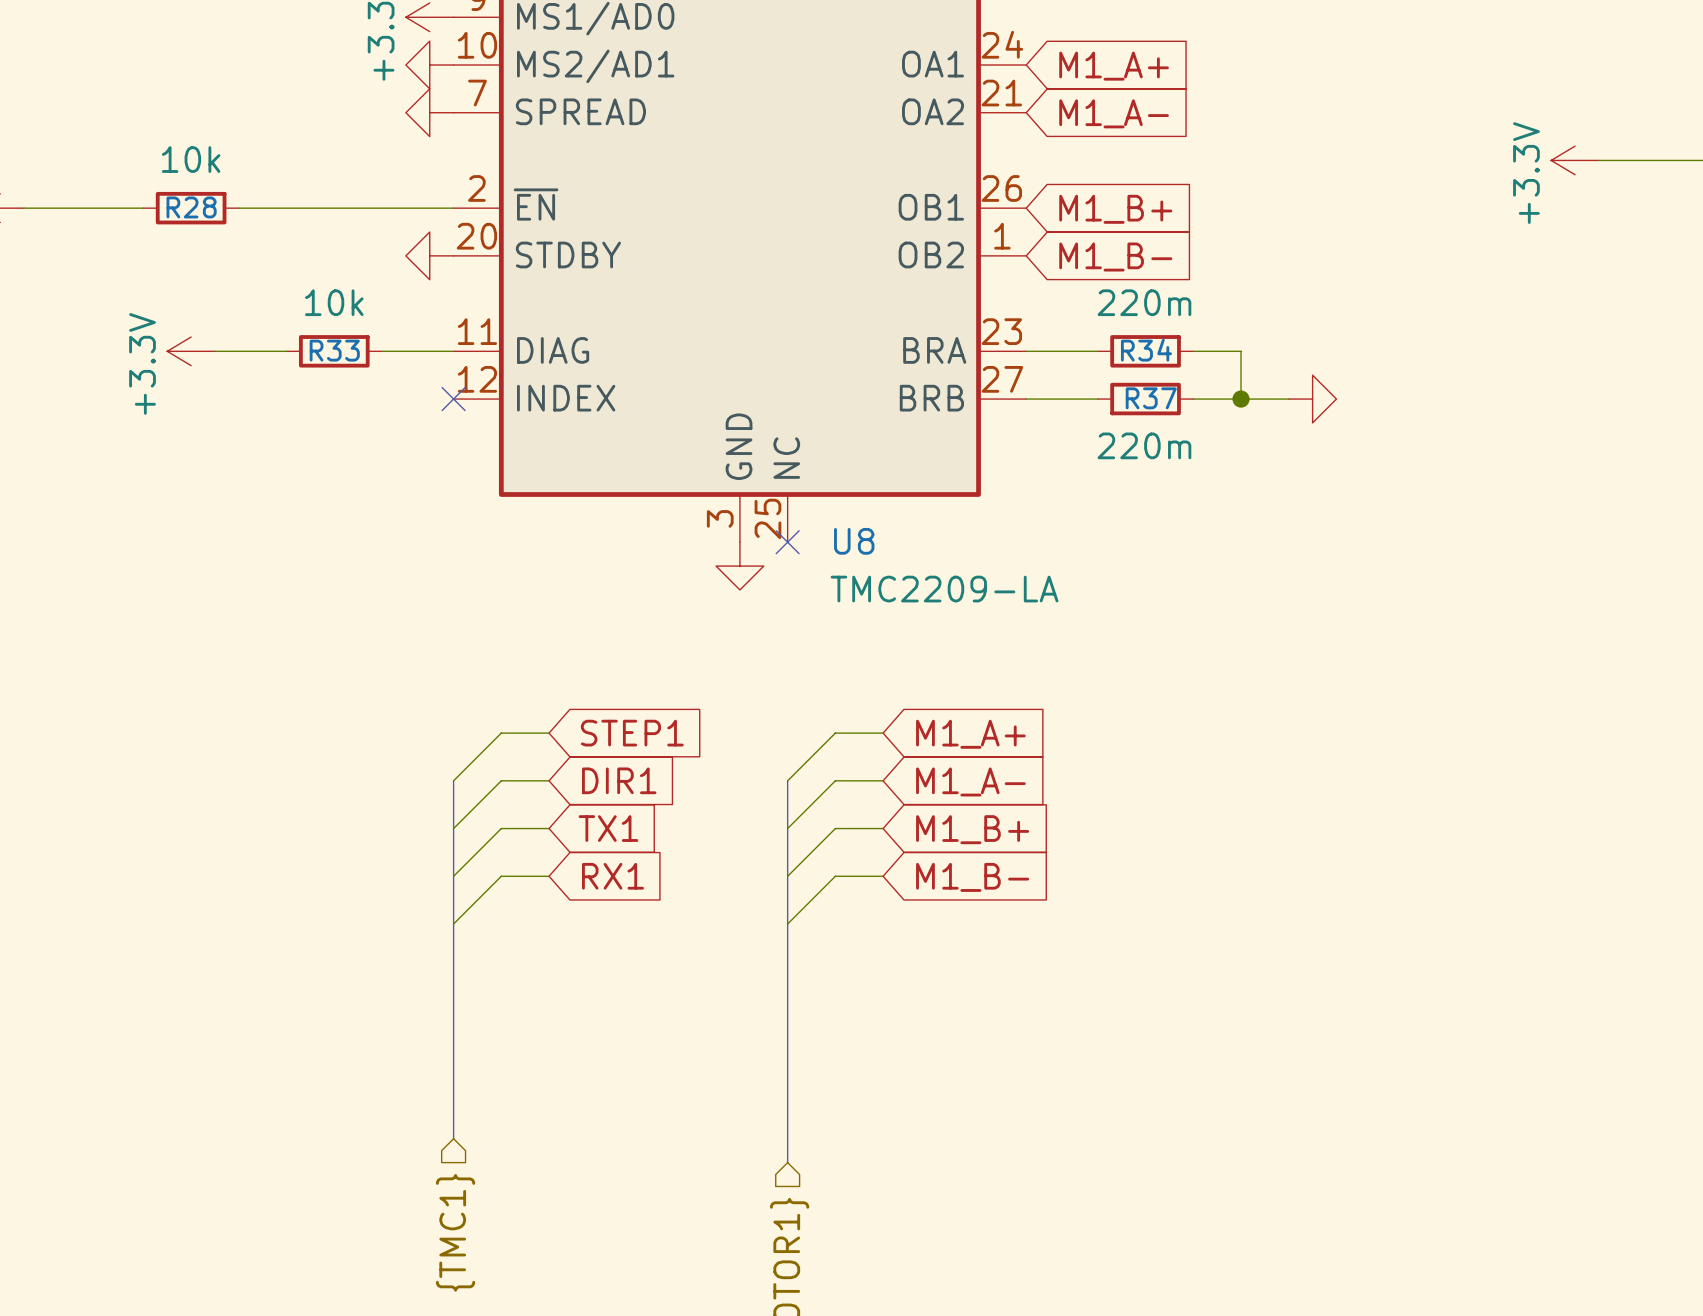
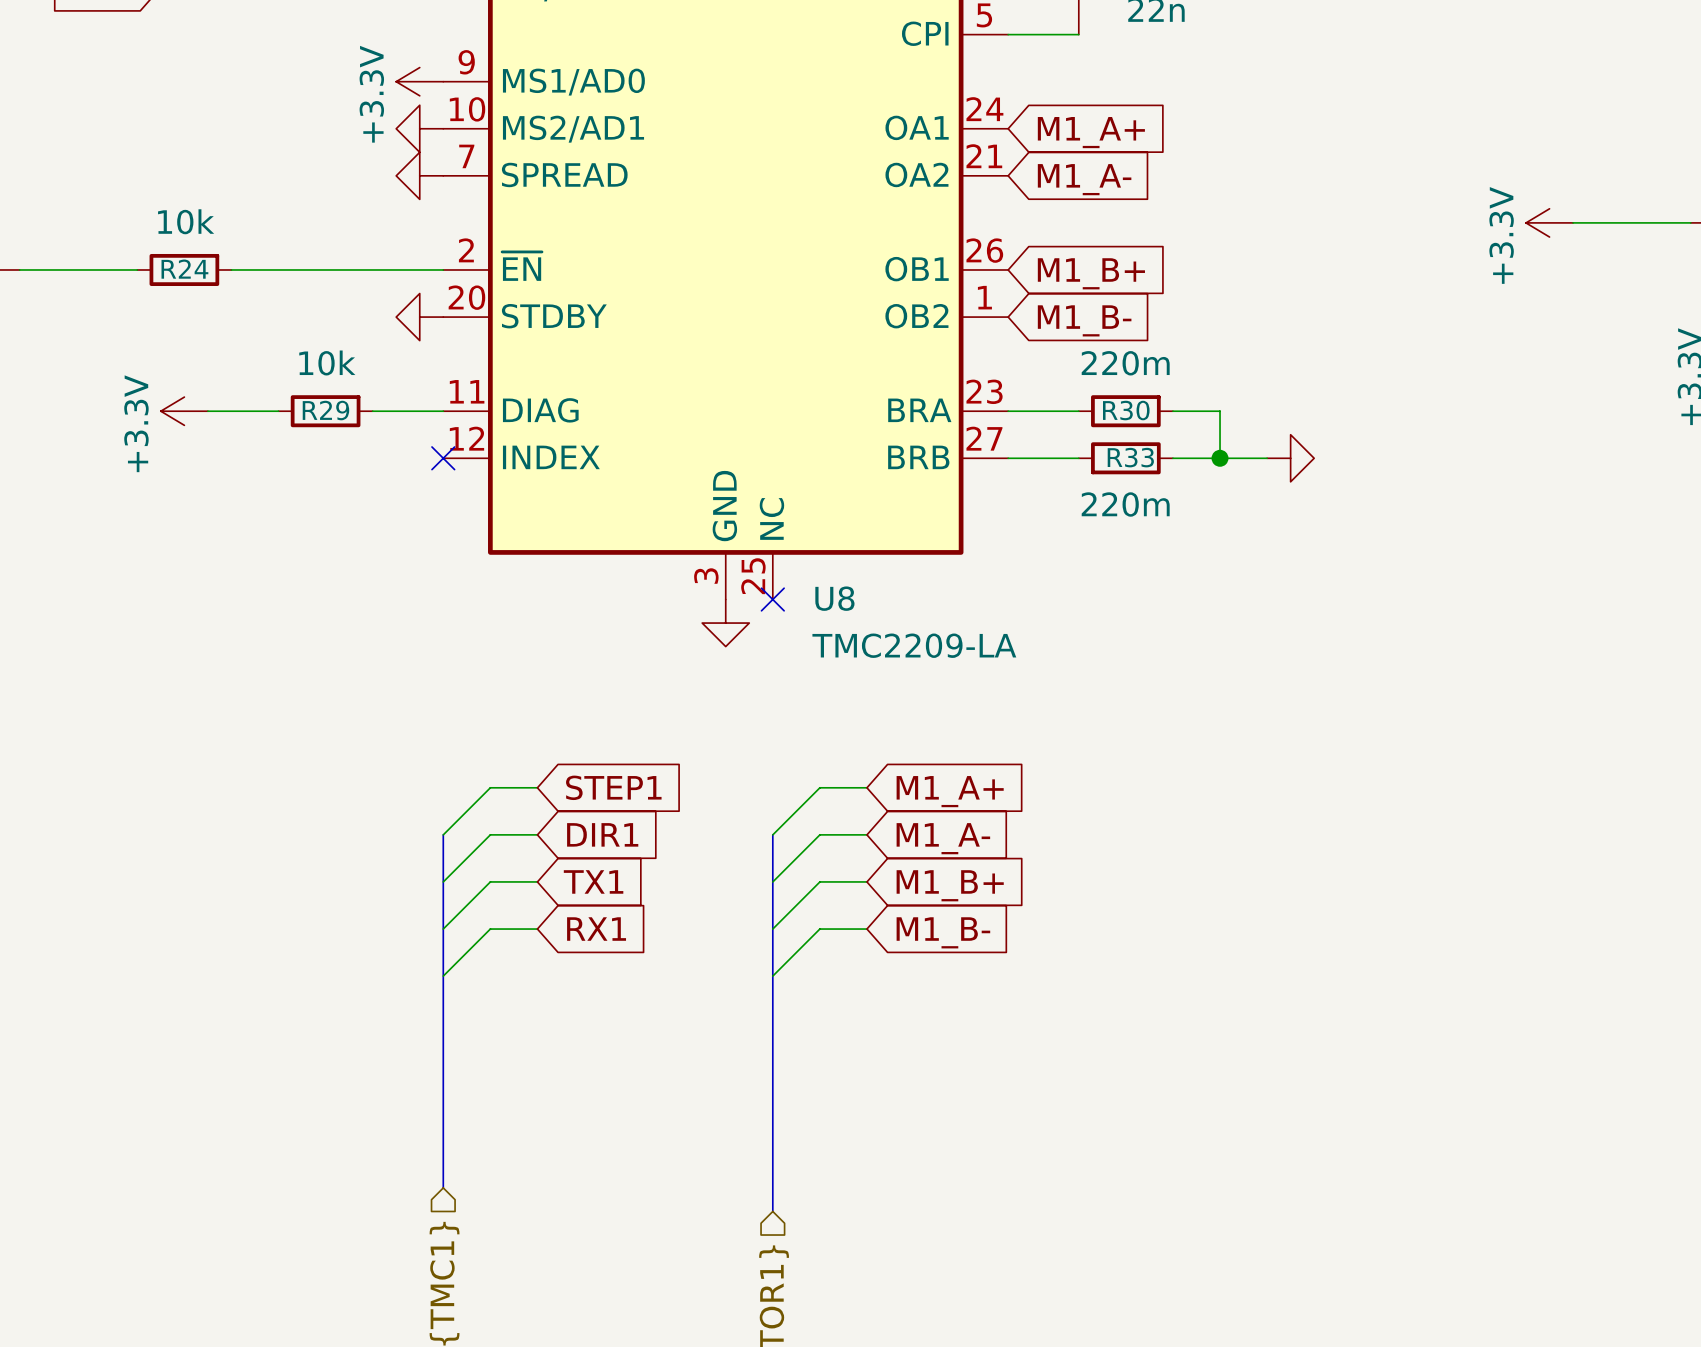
R28 name: R28 (191, 207) -> R24 (184, 269)
R33 name: R33 (334, 350) -> R29 (325, 410)
R34 name: R34 (1146, 350) -> R30 (1126, 410)
R37 name: R37 (1151, 398) -> R33 (1130, 457)

